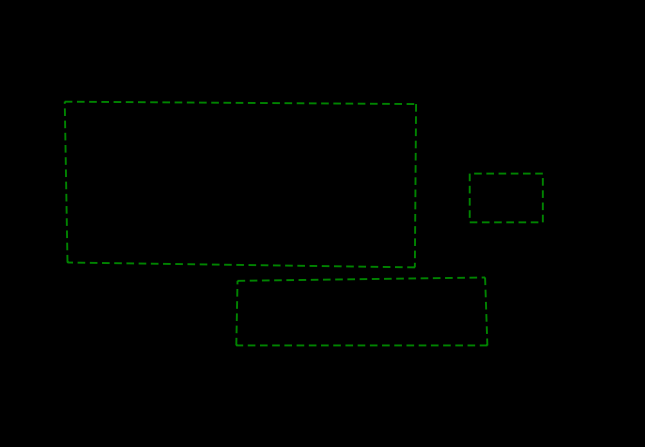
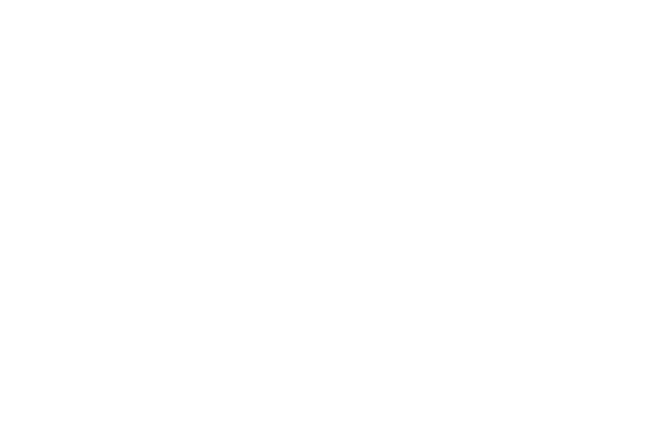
bottom zone outline: (64, 101) (416, 104) (414, 267) (67, 262) (64, 101) -> none
bottom zone outline: (469, 173) (469, 222) (542, 222) (542, 173) (469, 173) -> none
bottom zone outline: (485, 277) (487, 345) (236, 345) (237, 280) (485, 277) -> none

